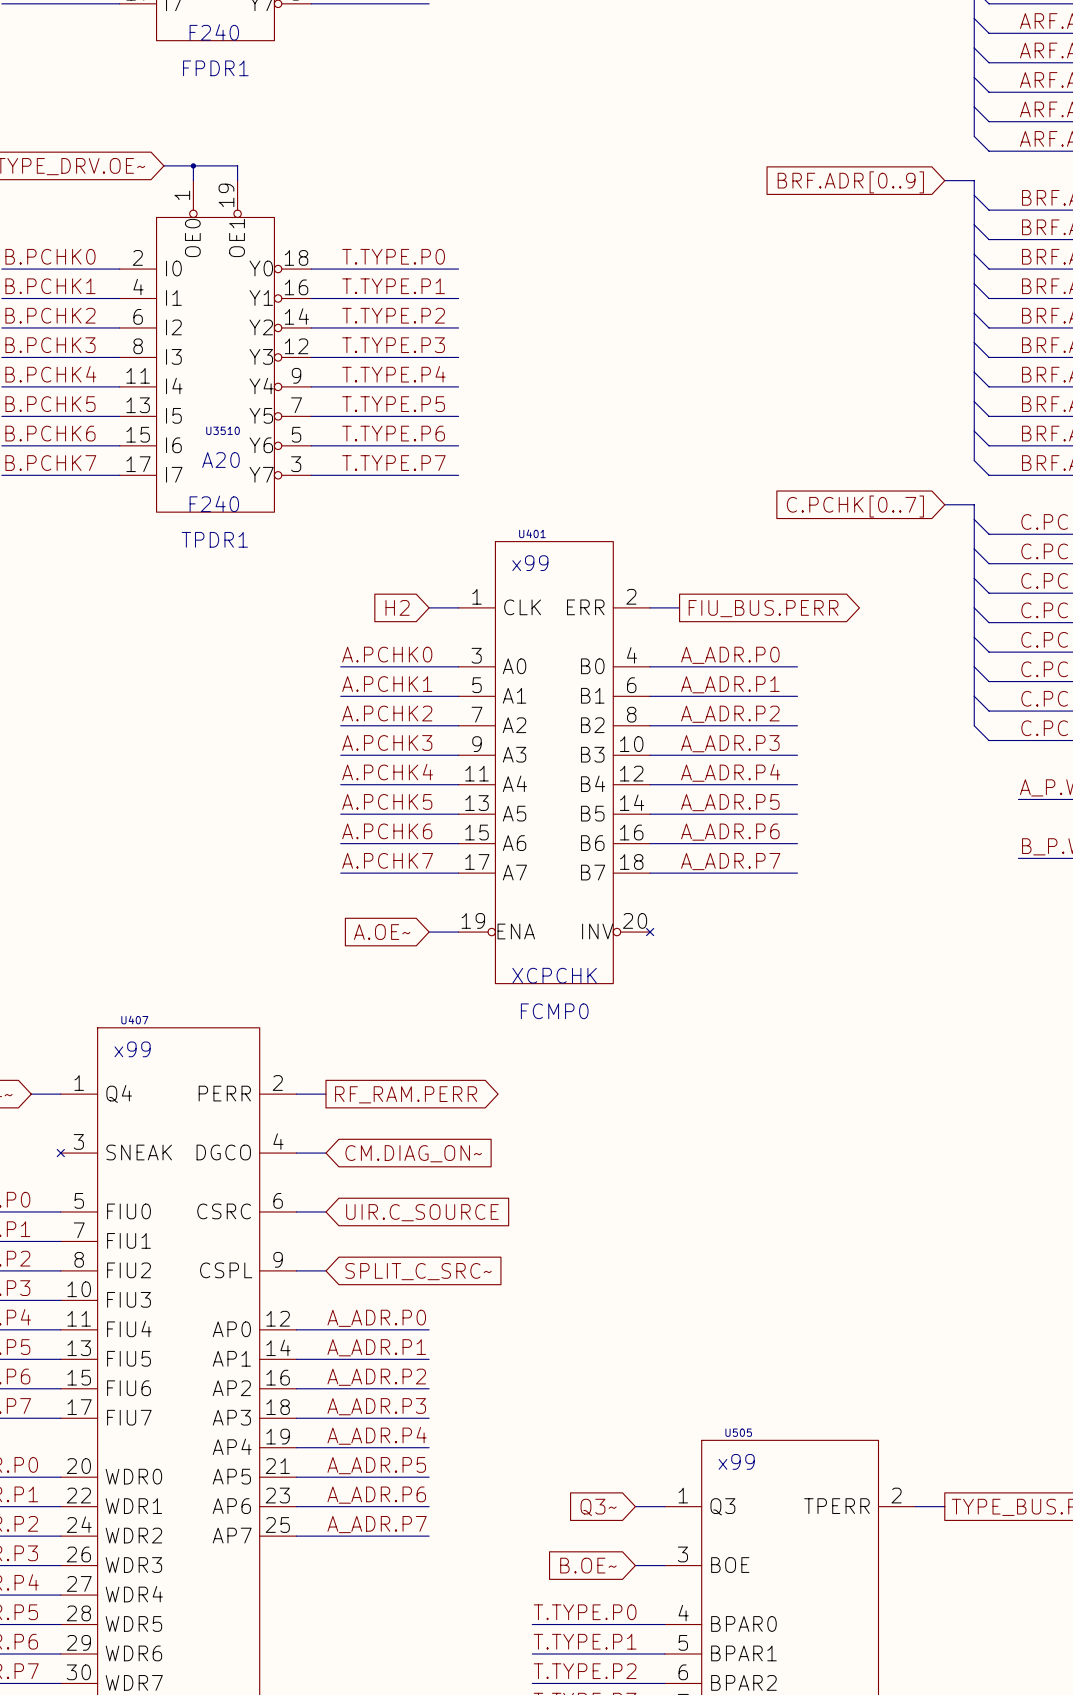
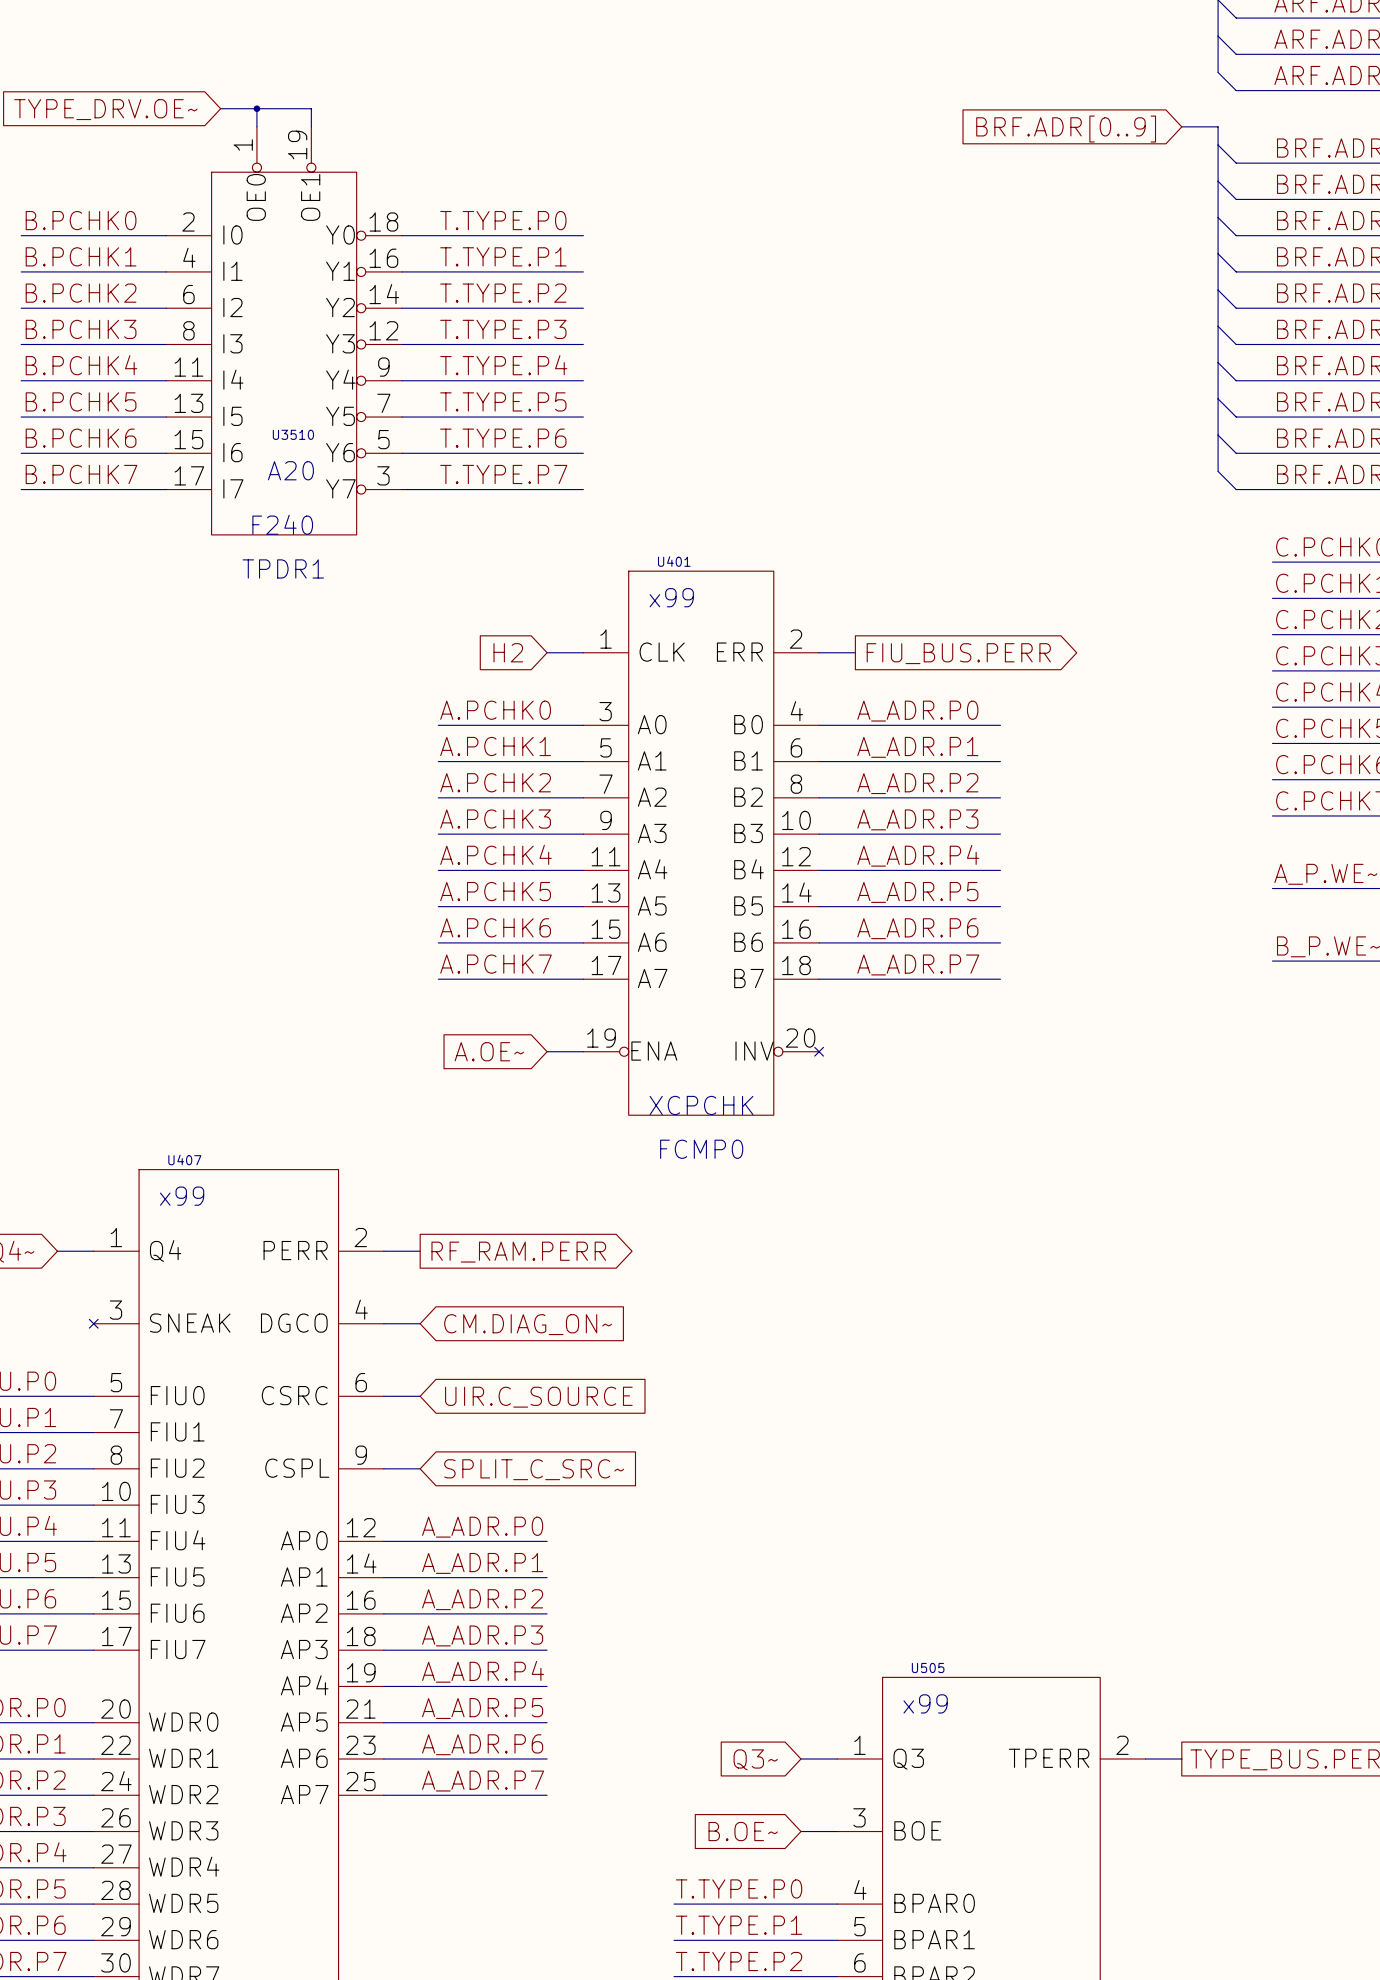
bus: (944, 504) (974, 504) (974, 725) -> none
global label: C.PCHK[0..7] (855, 506) -> none
wire: (974, 519) (988, 534) (1018, 534) -> none
wire: (974, 548) (988, 563) (1018, 563) -> none
wire: (974, 578) (988, 593) (1018, 593) -> none
wire: (974, 607) (988, 622) (1018, 622) -> none
wire: (974, 637) (988, 652) (1018, 652) -> none
wire: (974, 666) (988, 681) (1018, 681) -> none
wire: (974, 696) (988, 711) (1018, 711) -> none
wire: (974, 725) (988, 740) (1018, 740) -> none

